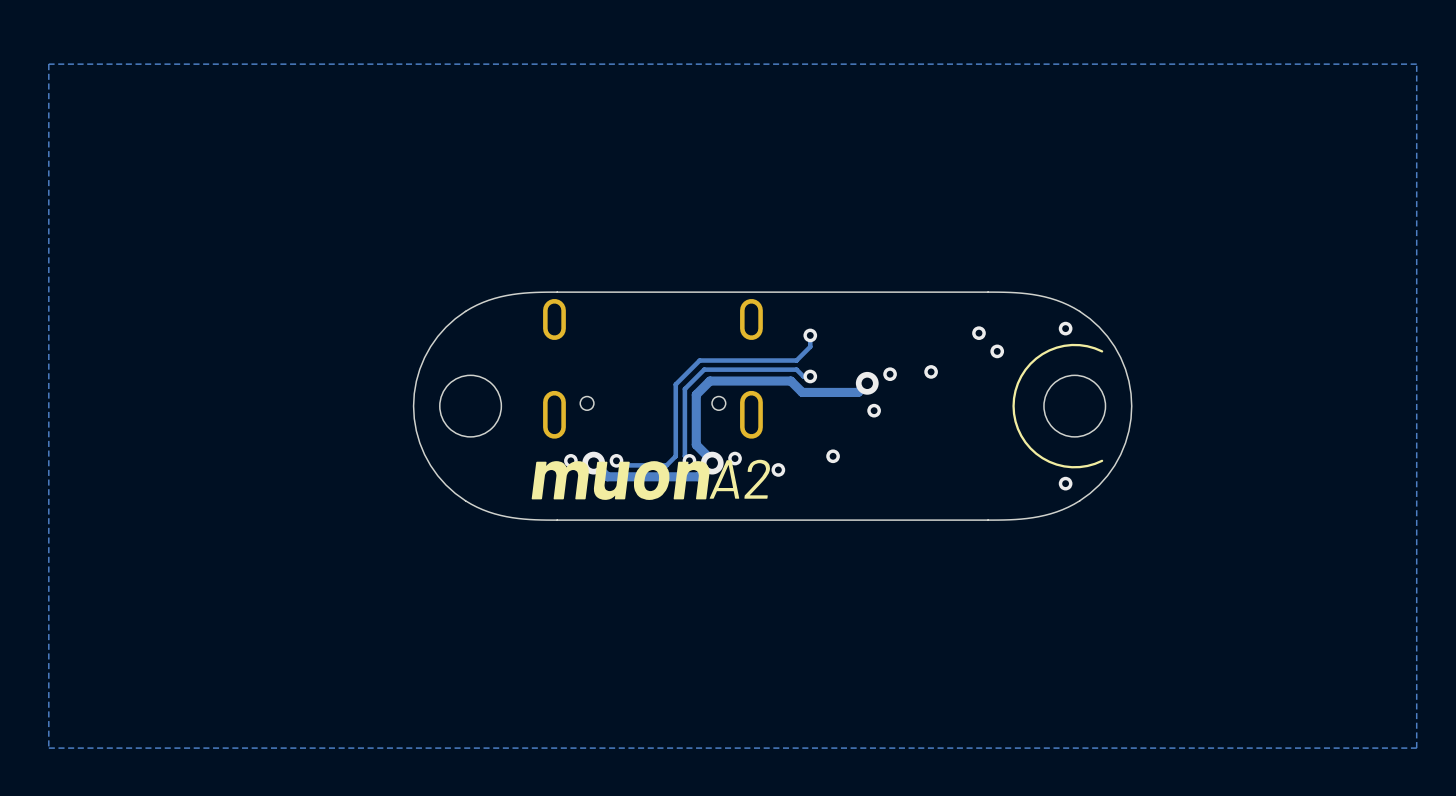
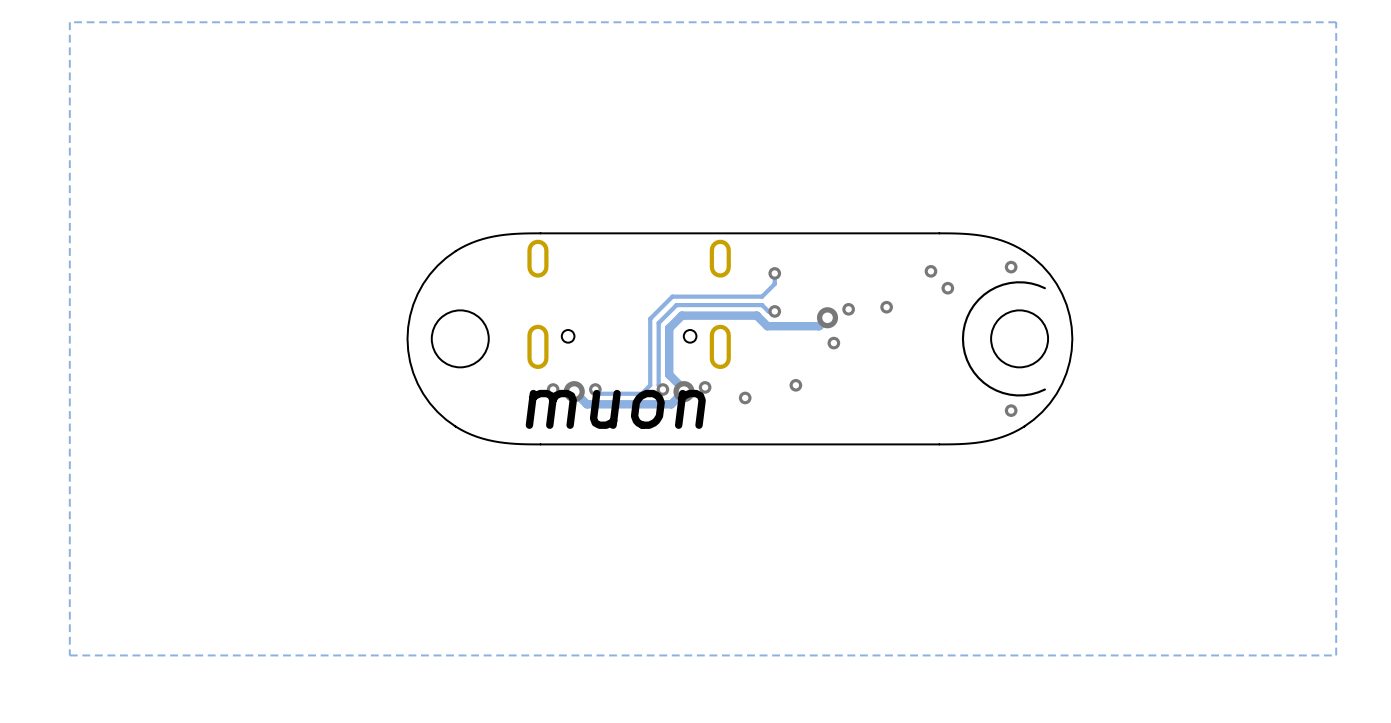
text: A2 (739, 479) -> none

